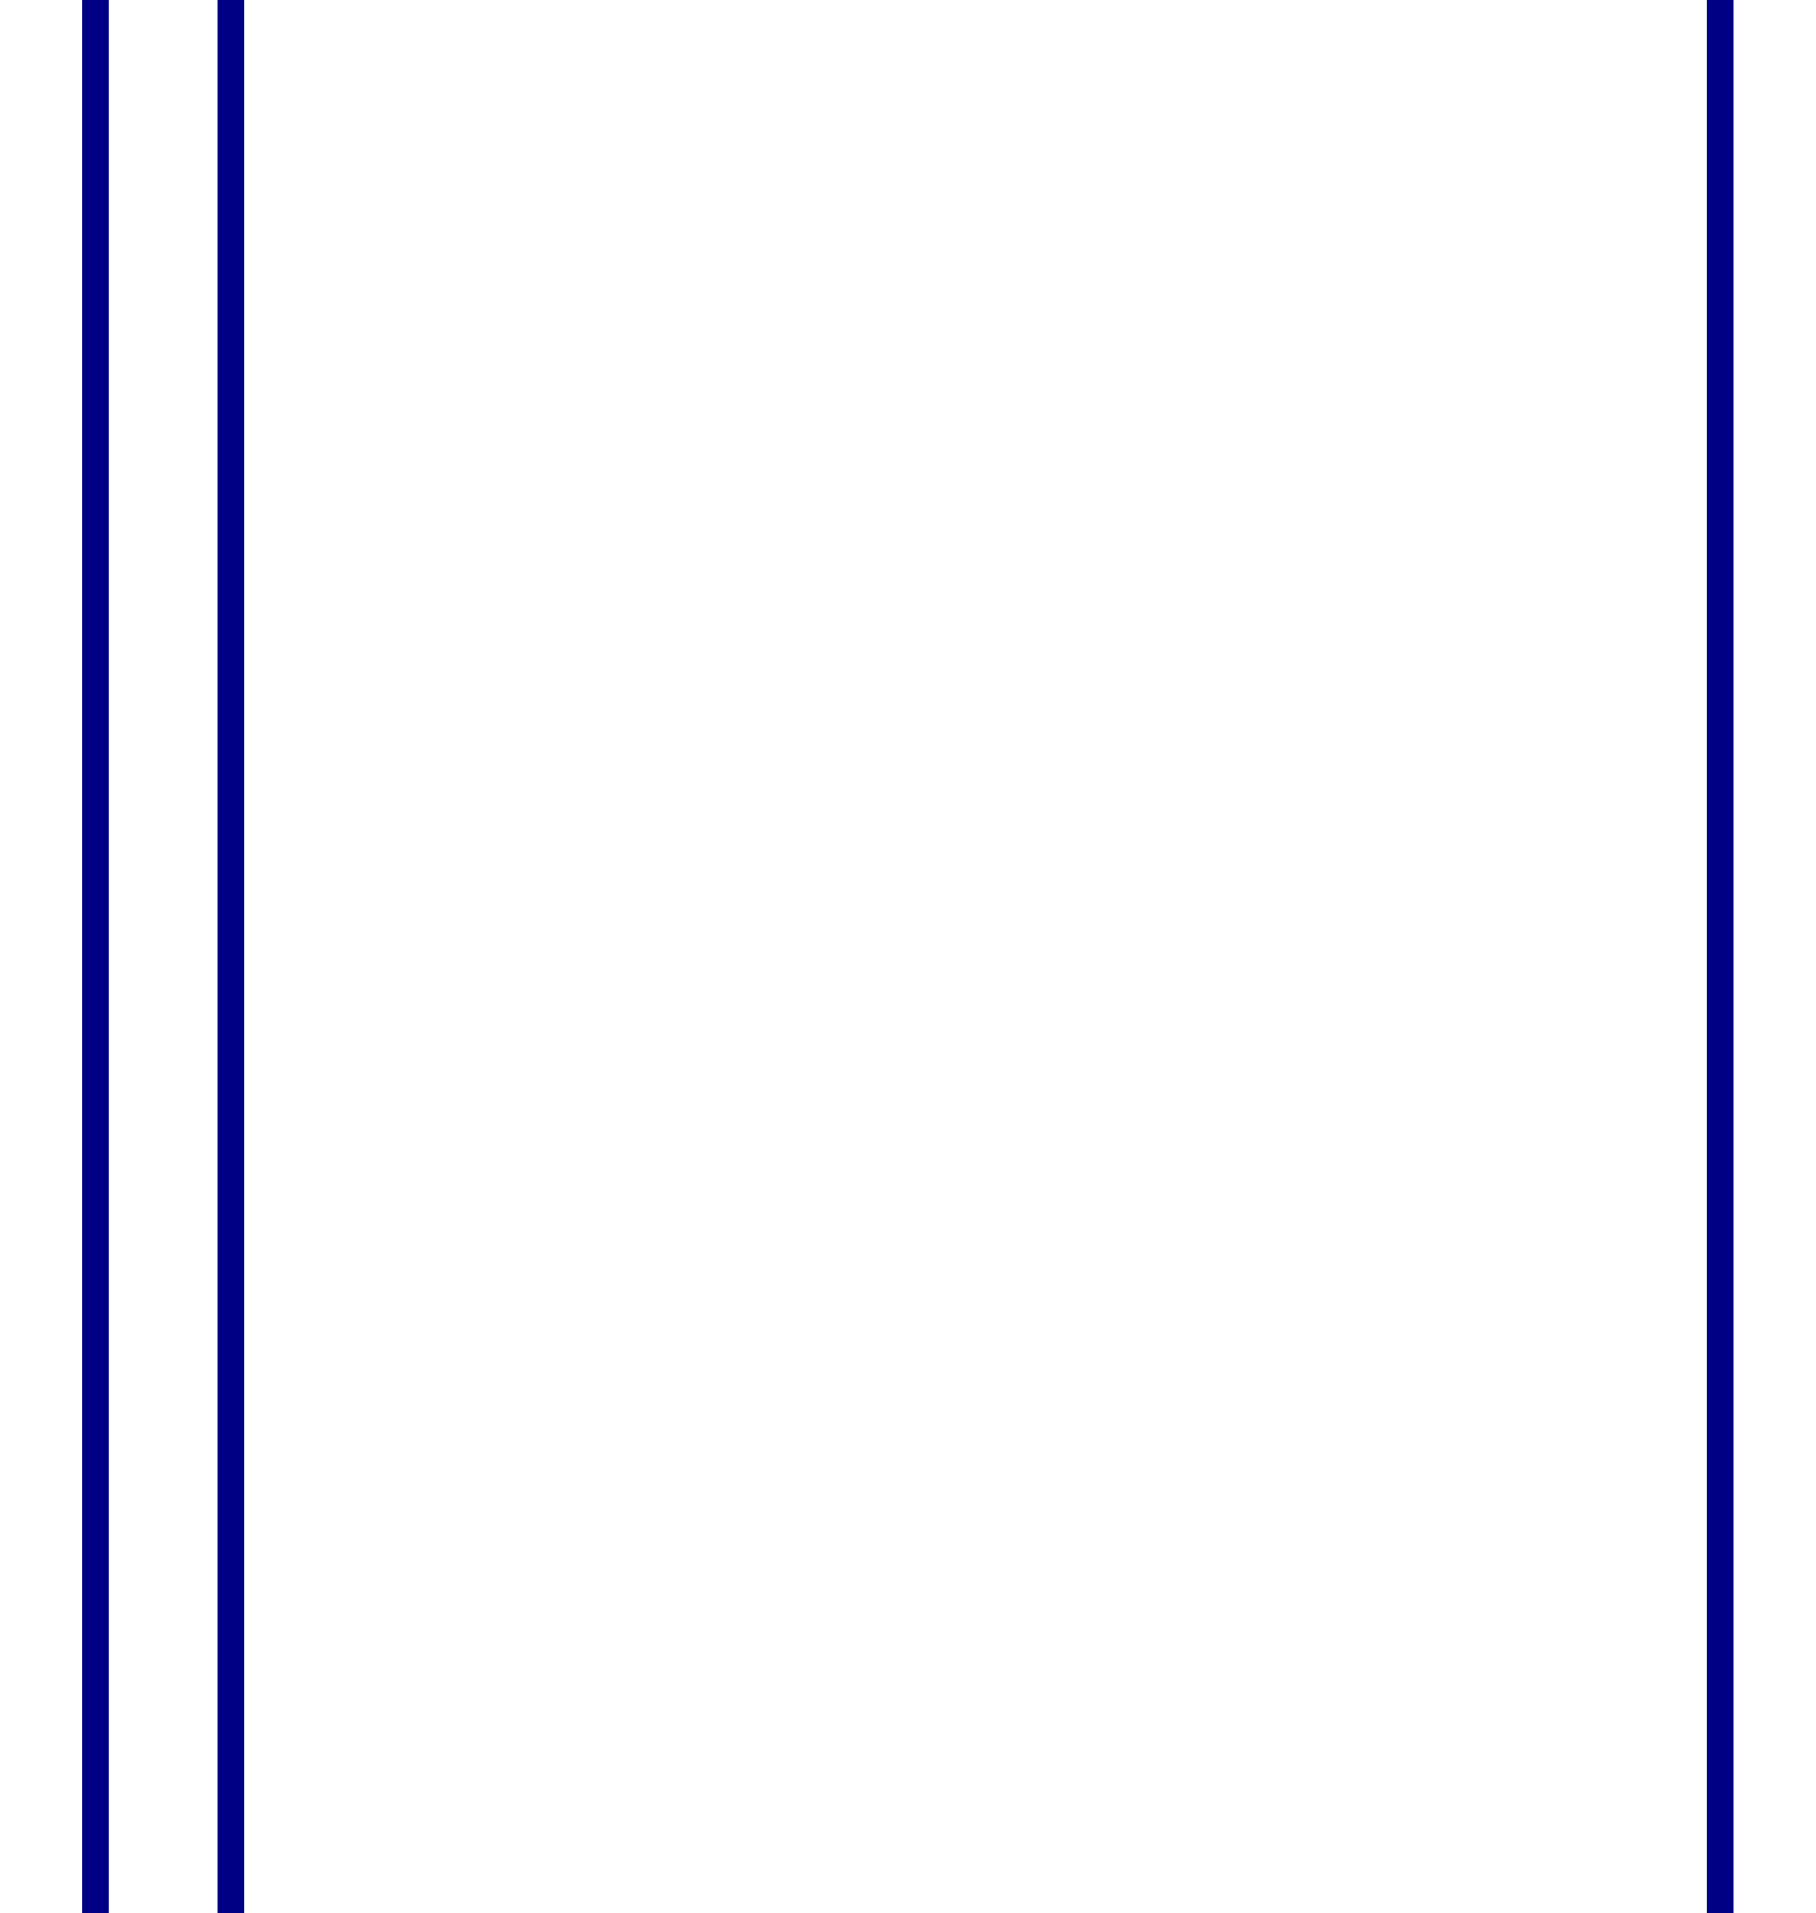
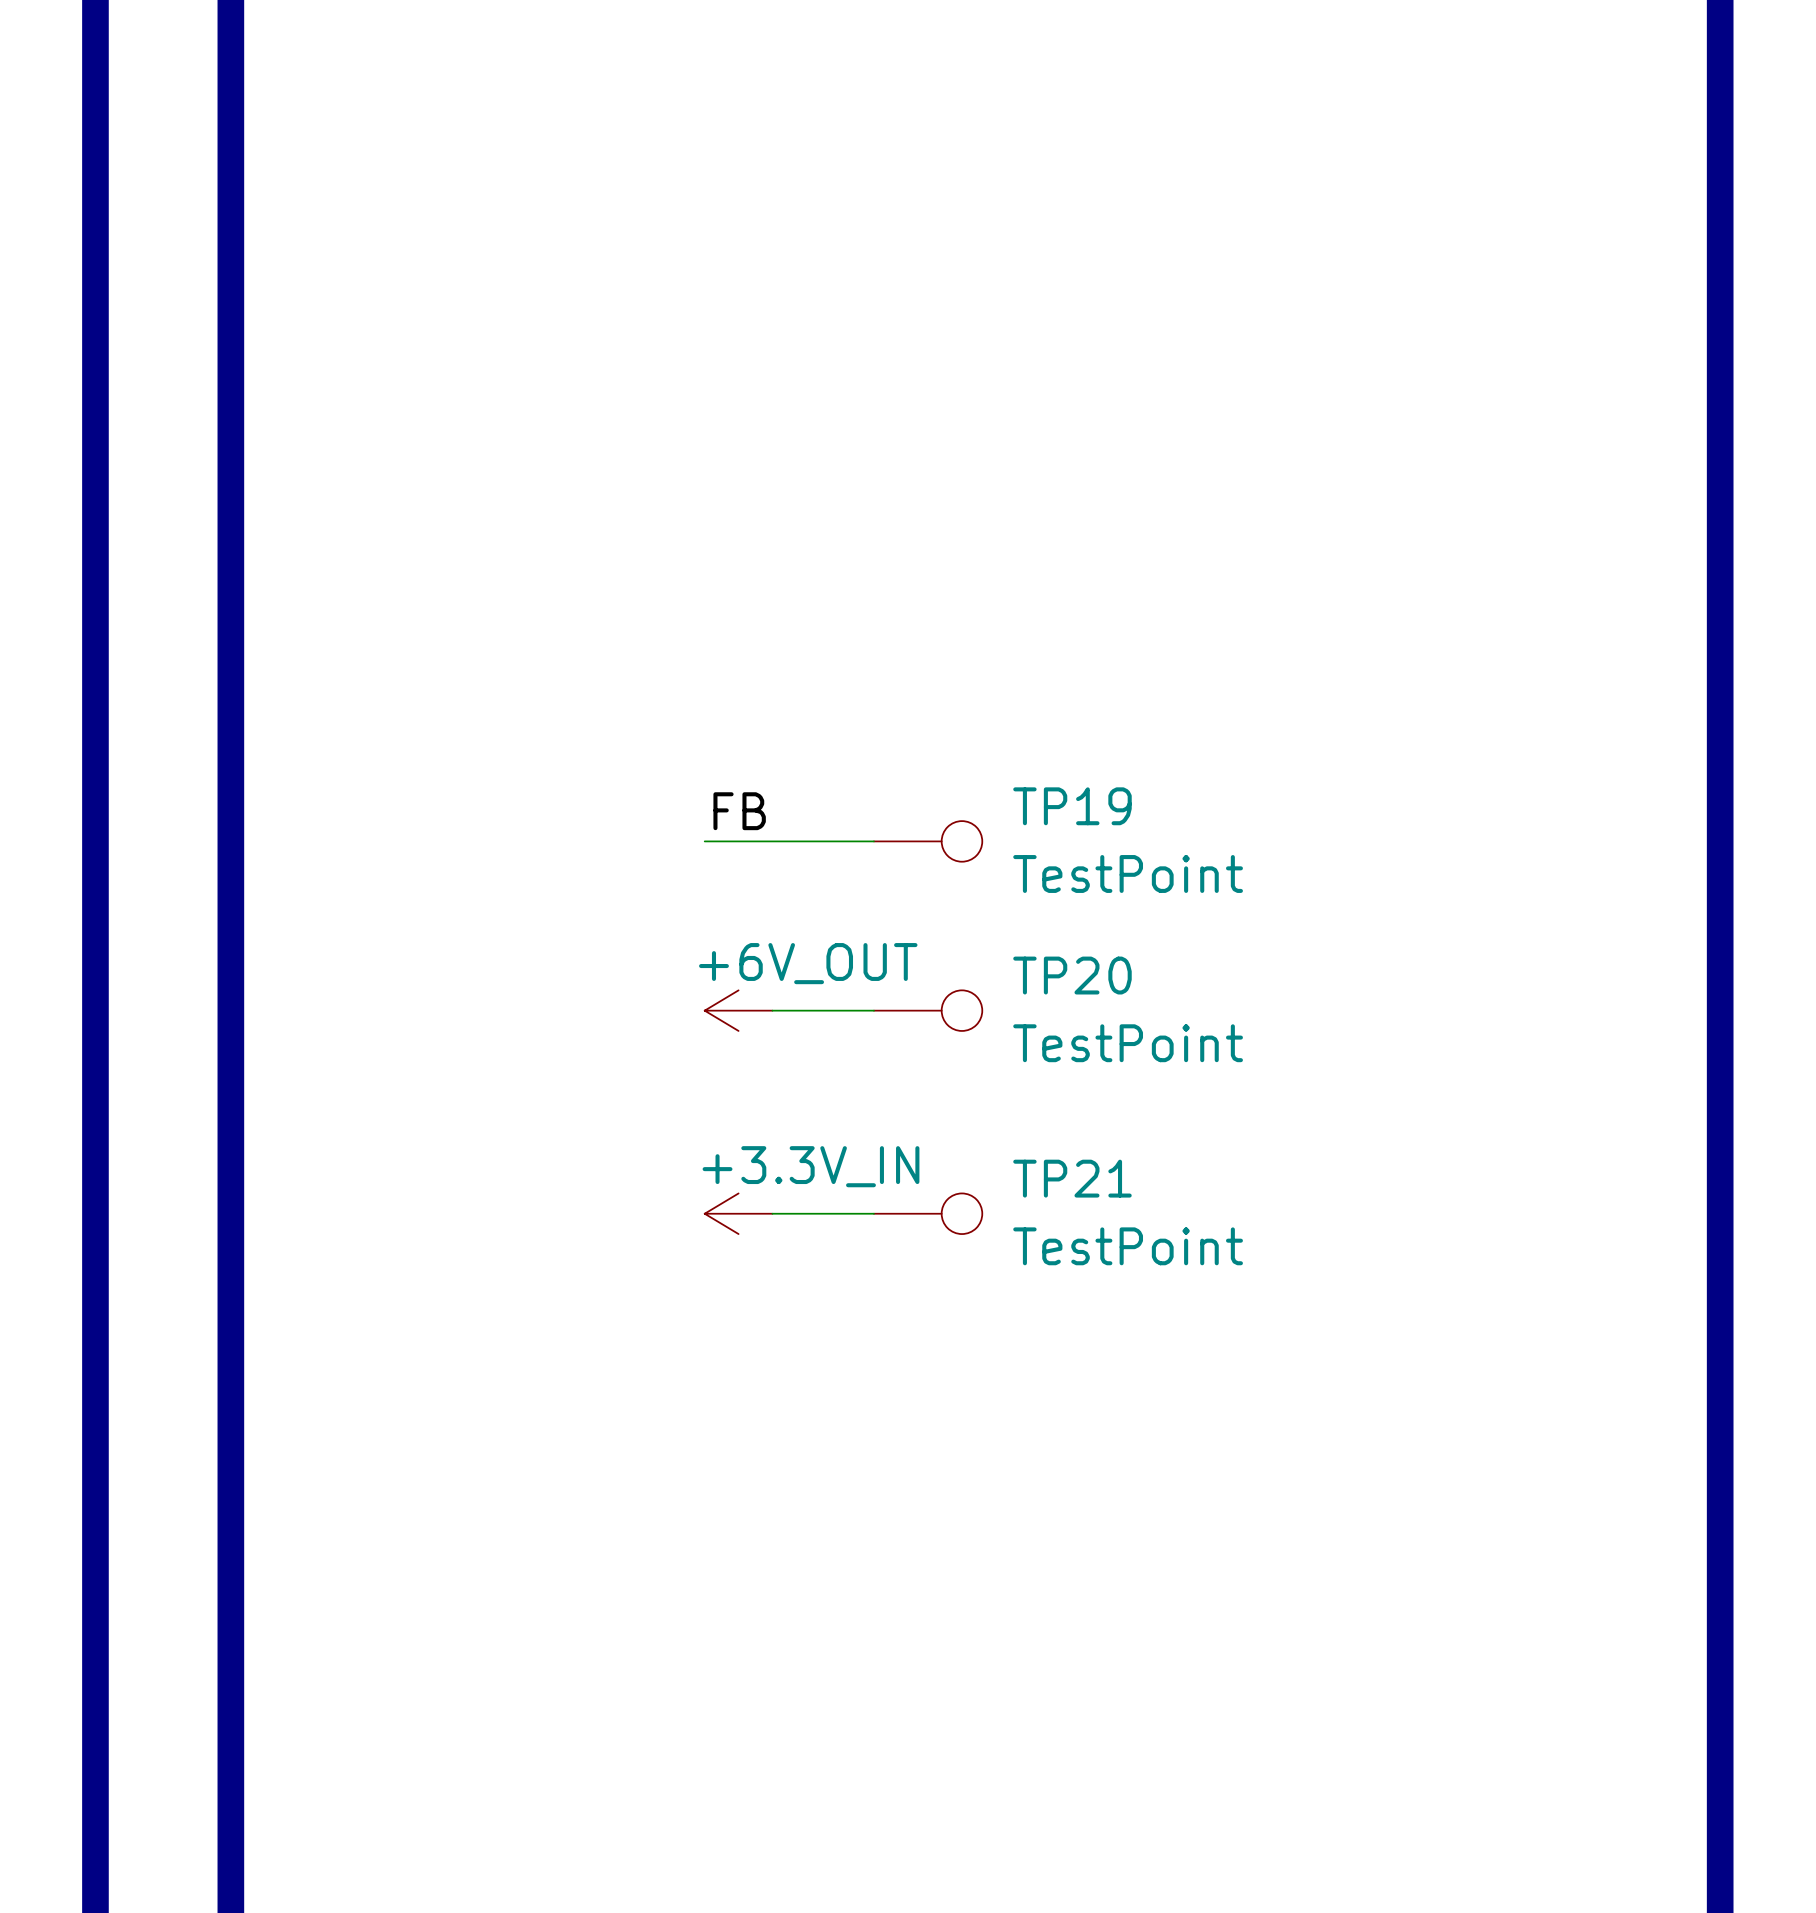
label: none -> FB (739, 811)
wire: none -> (704, 841) (873, 841)
TP19: none -> TestPoint (928, 841)
power symbol: none -> +6V_OUT (738, 1010)
wire: none -> (772, 1010) (873, 1010)
TP20: none -> TestPoint (928, 1010)
power symbol: none -> +3.3V_IN (738, 1213)
wire: none -> (772, 1213) (873, 1213)
TP21: none -> TestPoint (928, 1213)

